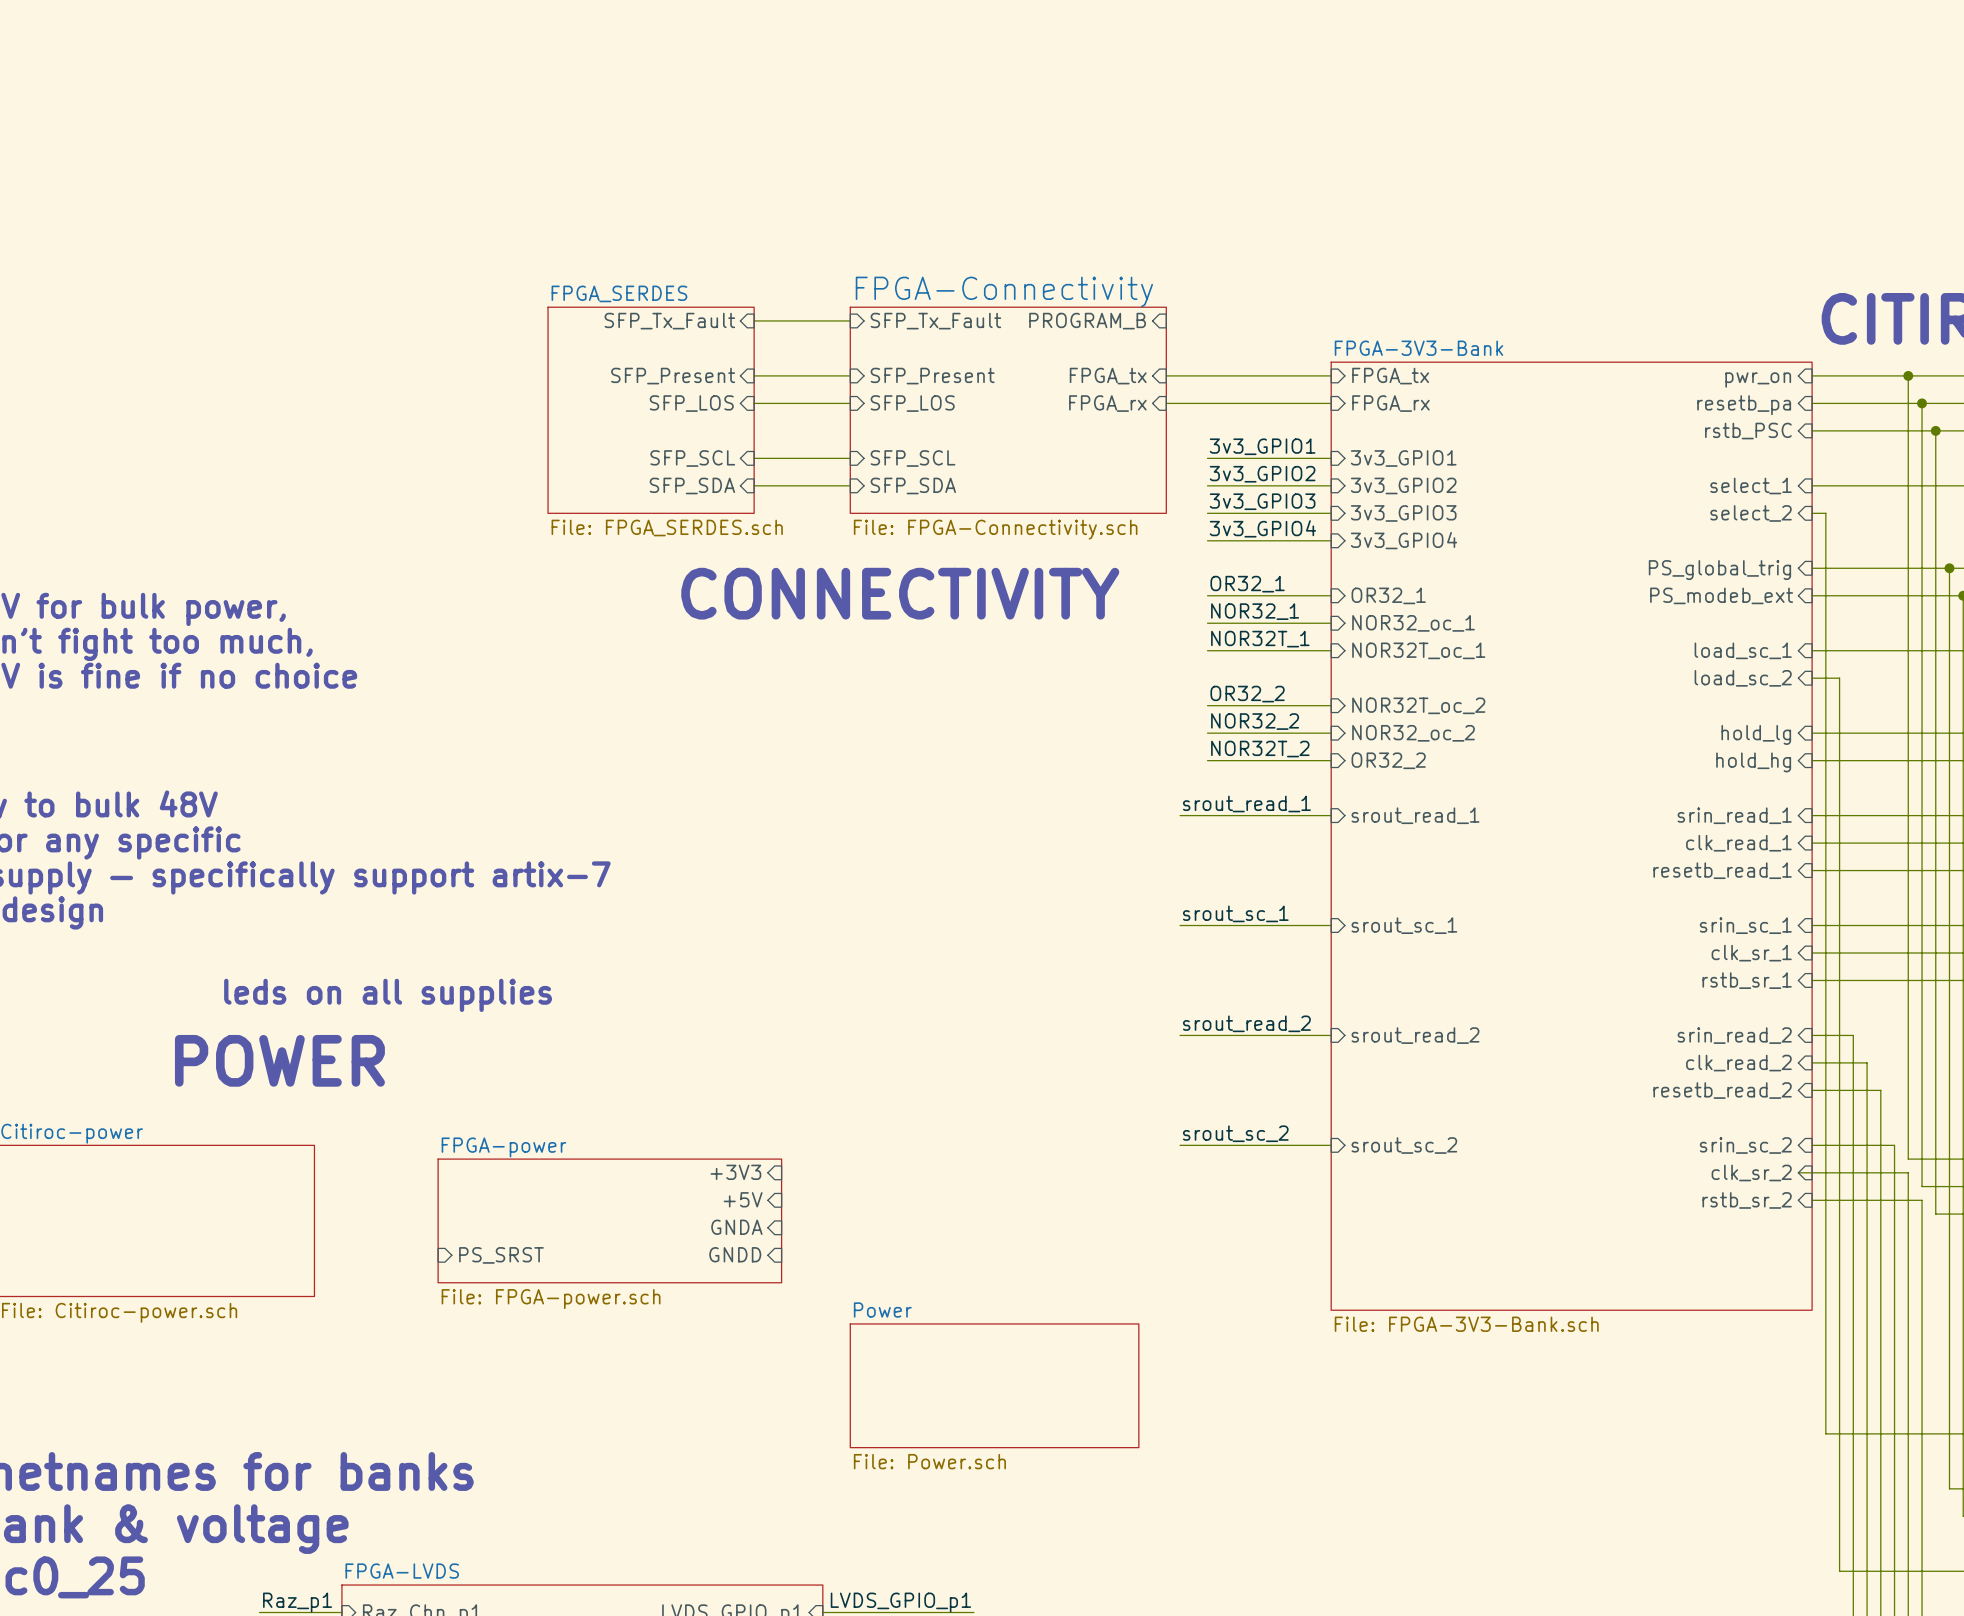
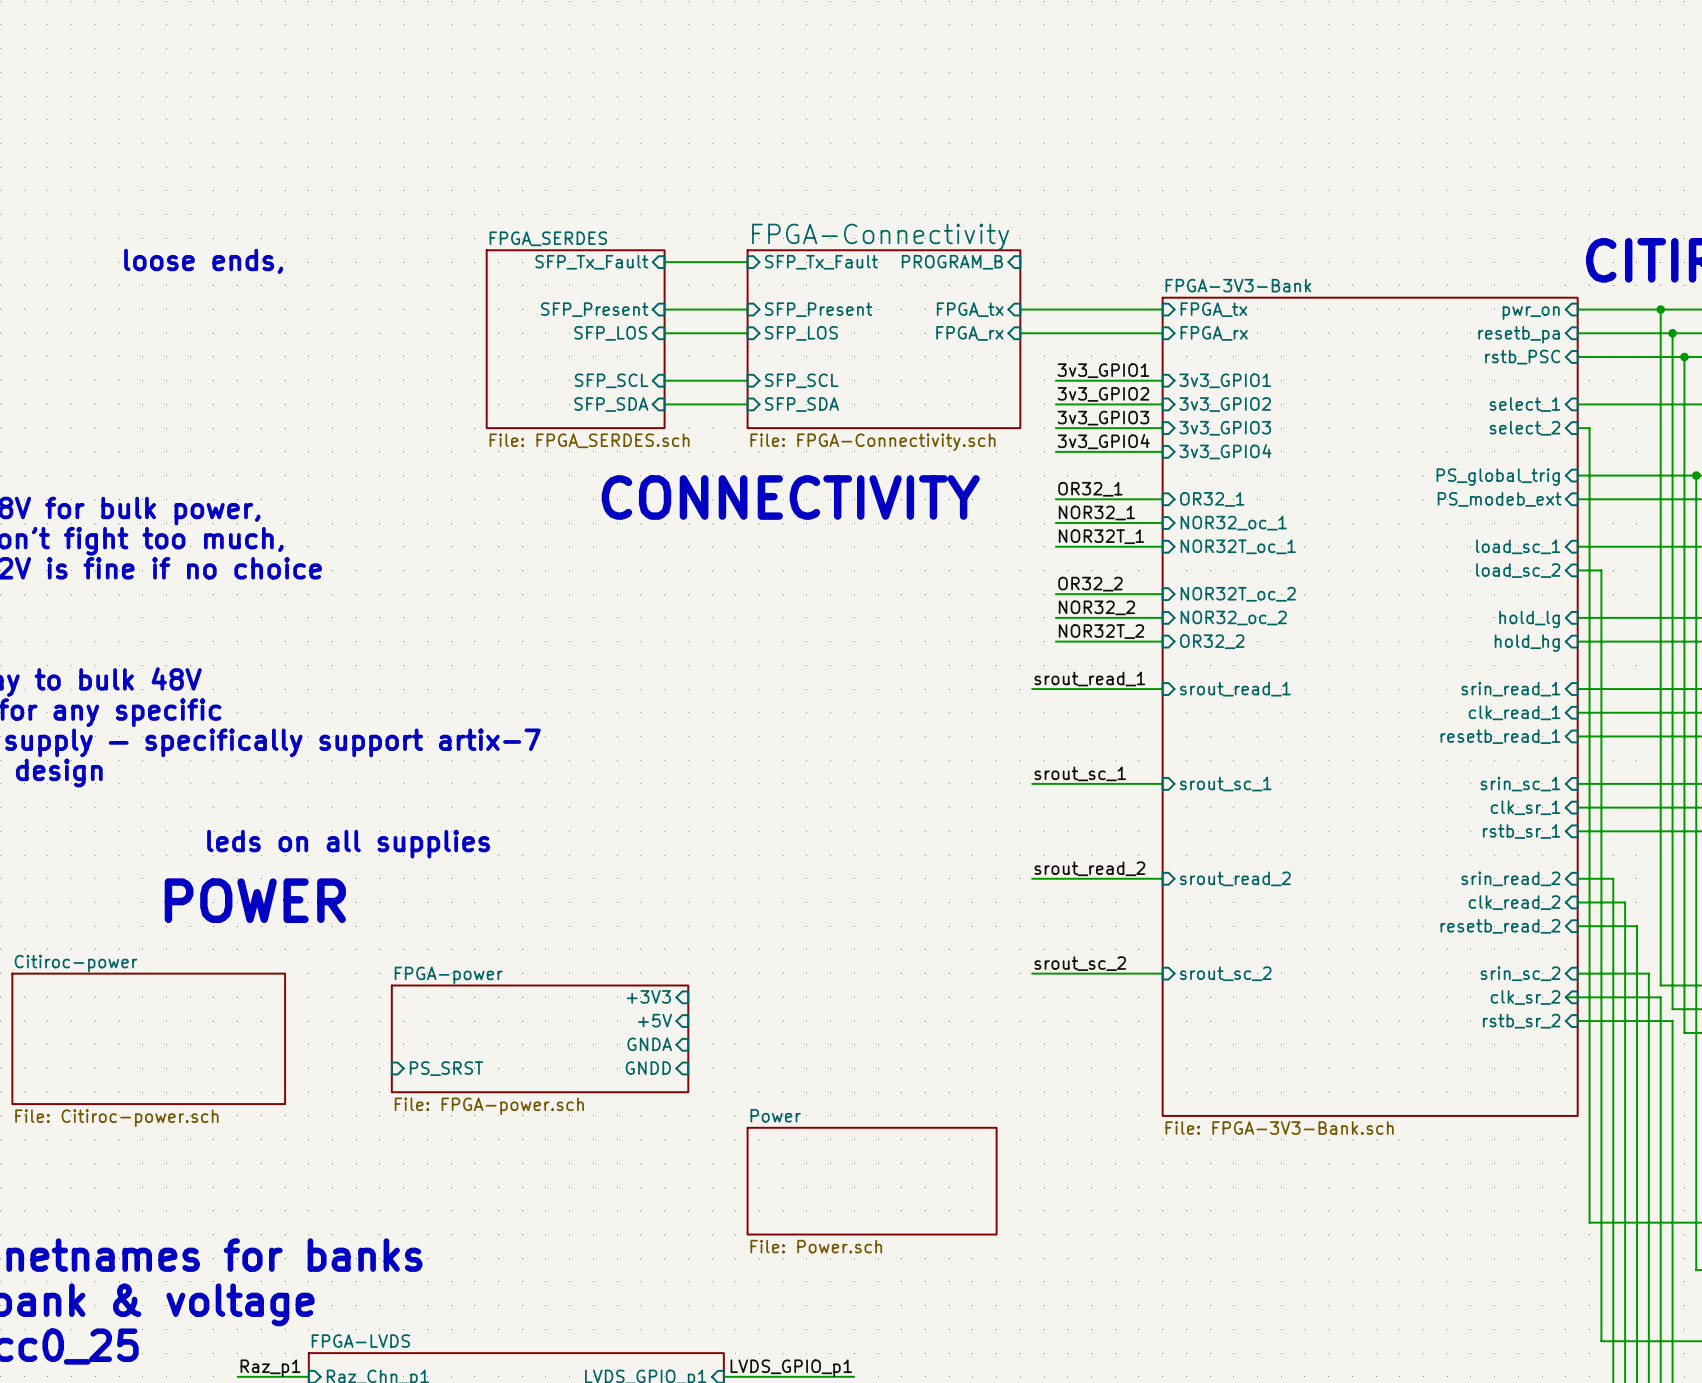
text: none -> loose ends, (203, 261)

